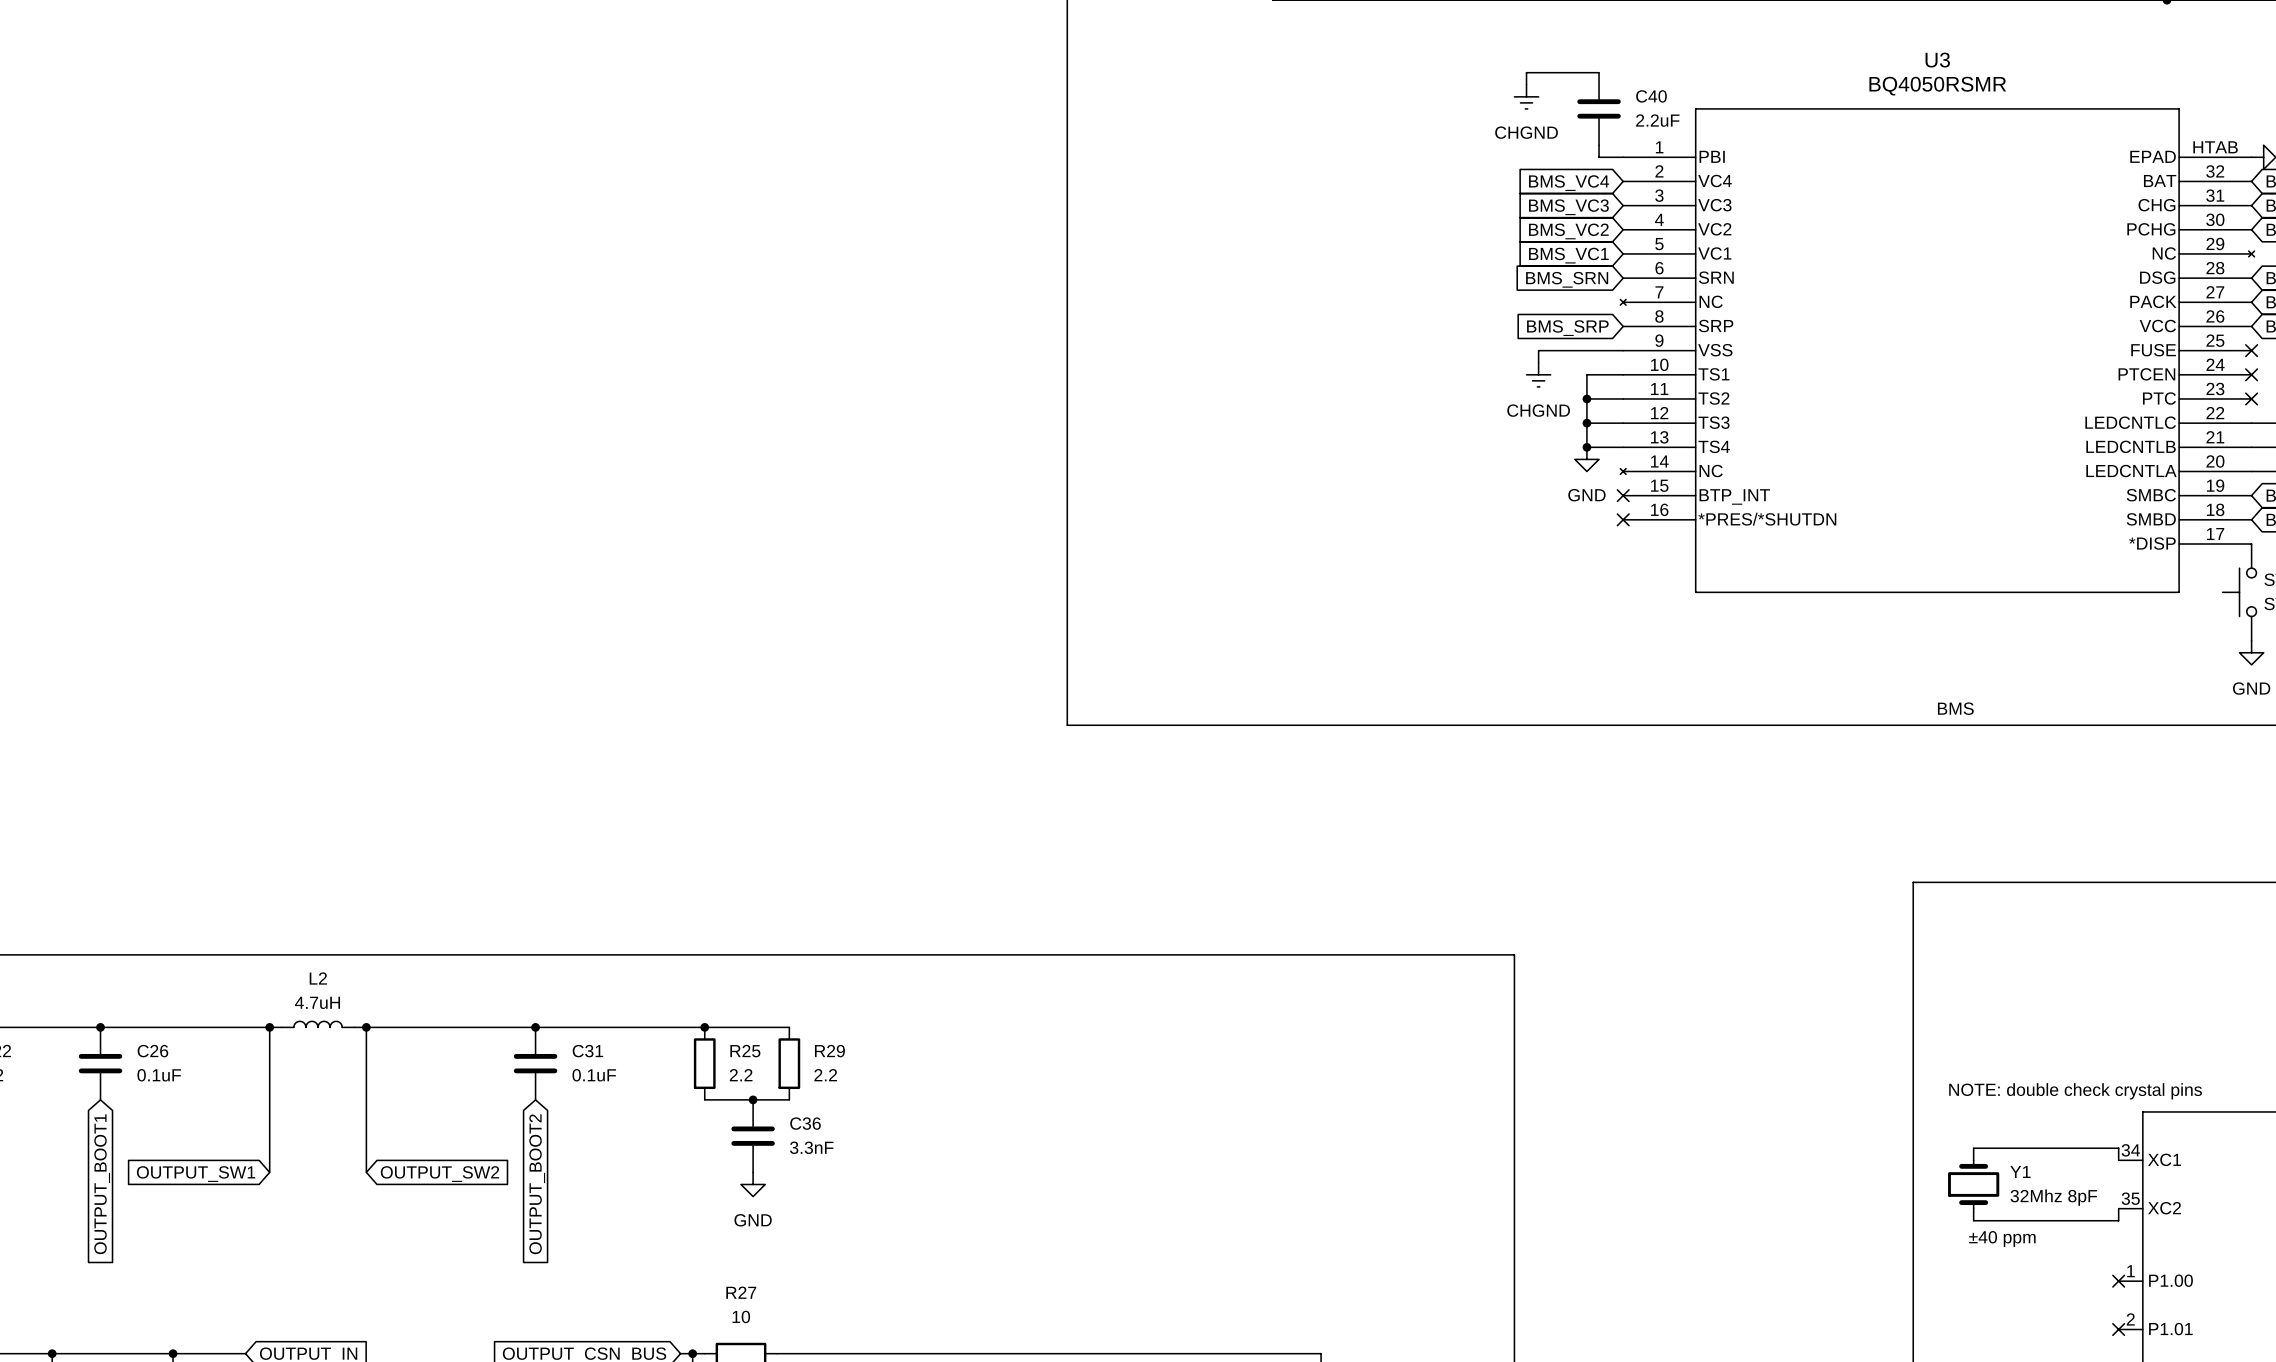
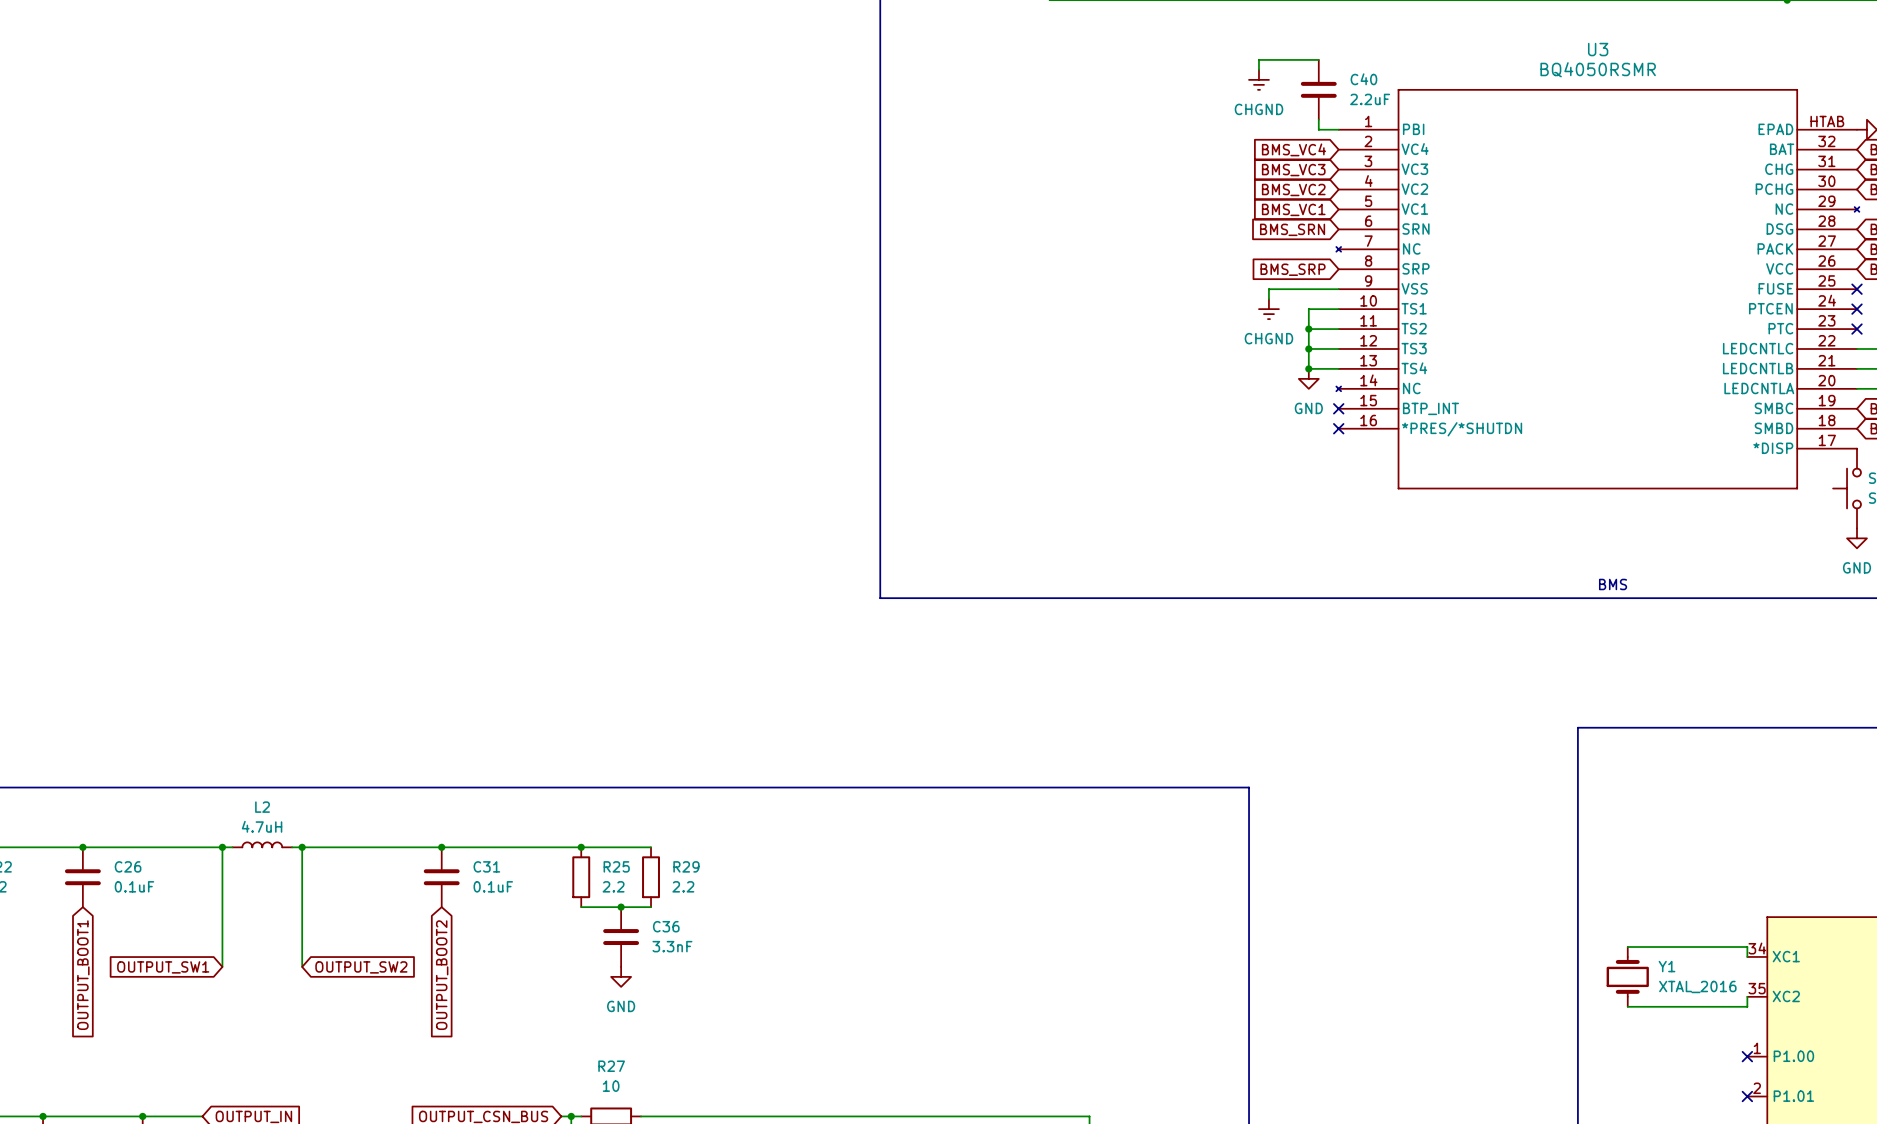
text: NOTE: double check crystal pins (2075, 1091) -> none
Y1 value: 32Mhz 8pF (2053, 1197) -> XTAL_2016 (1697, 986)
text: ±40 ppm (2002, 1238) -> none

